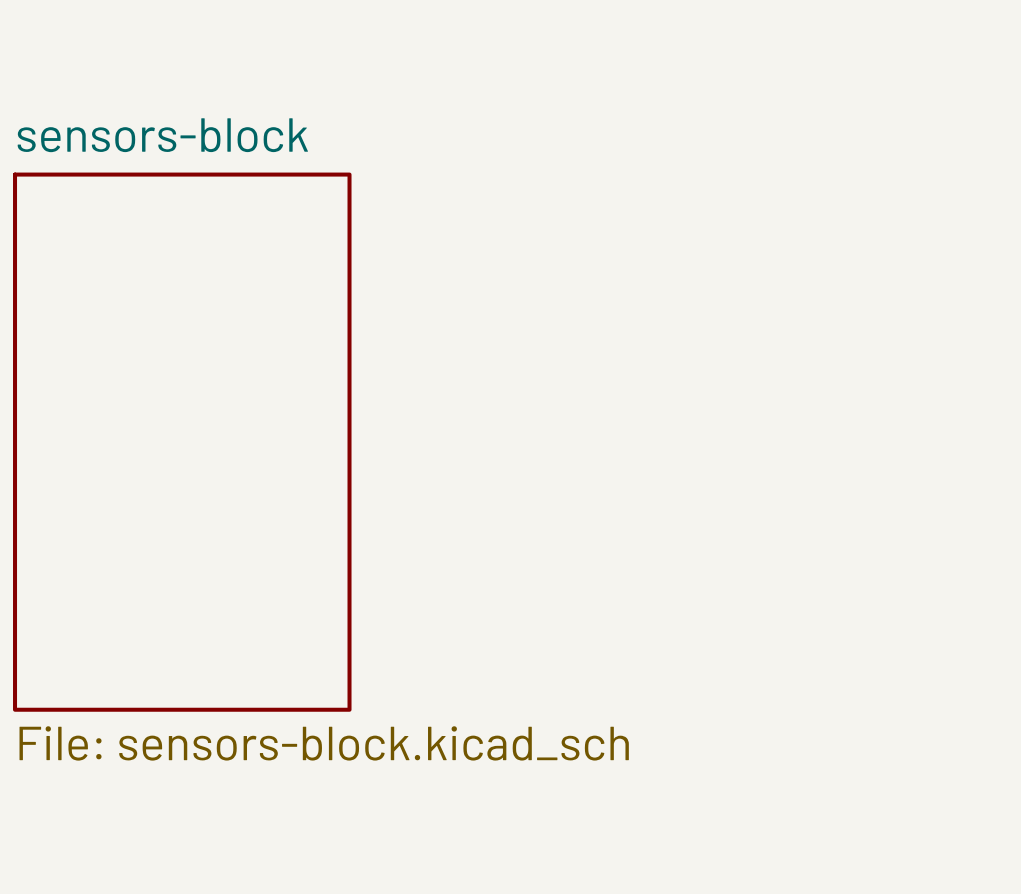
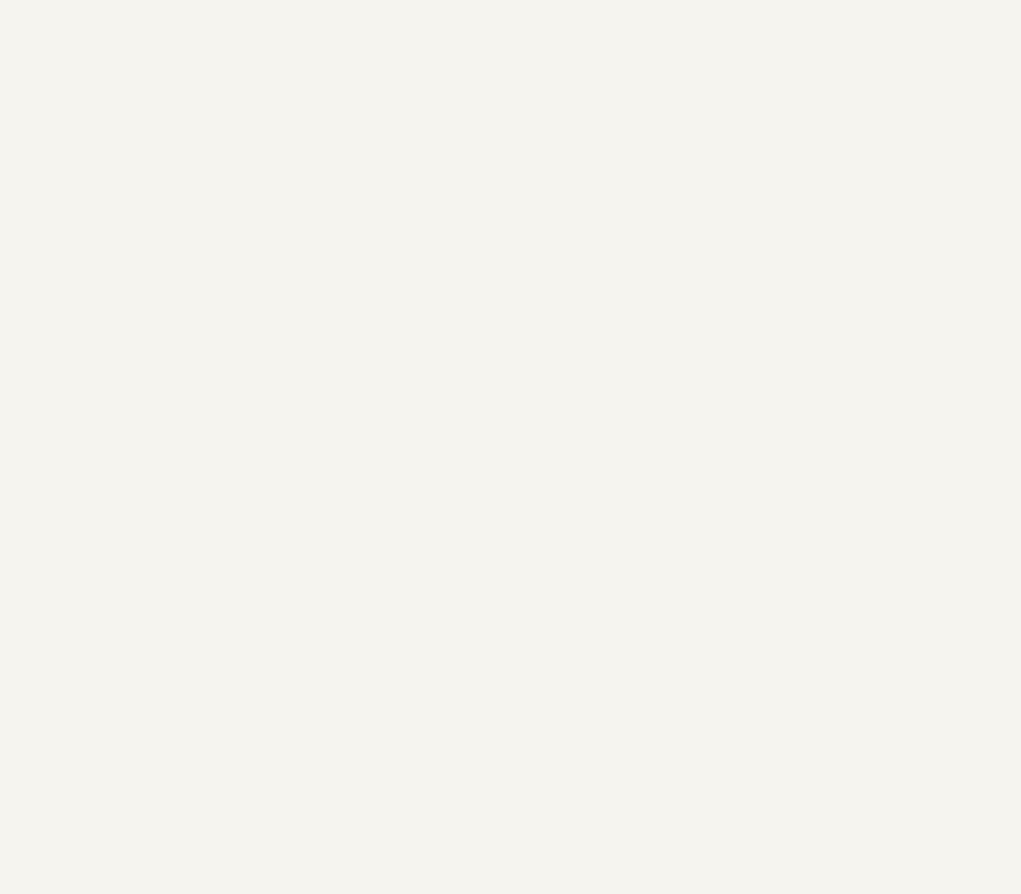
sheet sensors-block: File: sensors-block.kicad_sch (182, 442) -> none

